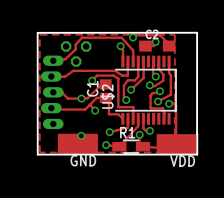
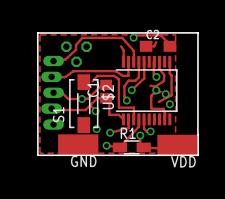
via: (155, 41) -> none
via: (120, 46) -> none
via: (92, 80) -> none
via: (149, 85) -> none
via: none -> (156, 90)
via: (159, 91) -> none
via: none -> (165, 94)
via: (158, 101) -> none
S1: none -> (83, 103)
track: (169, 103) (173, 102) (176, 105) (176, 144) -> none
via position: (81, 135) -> (96, 129)

